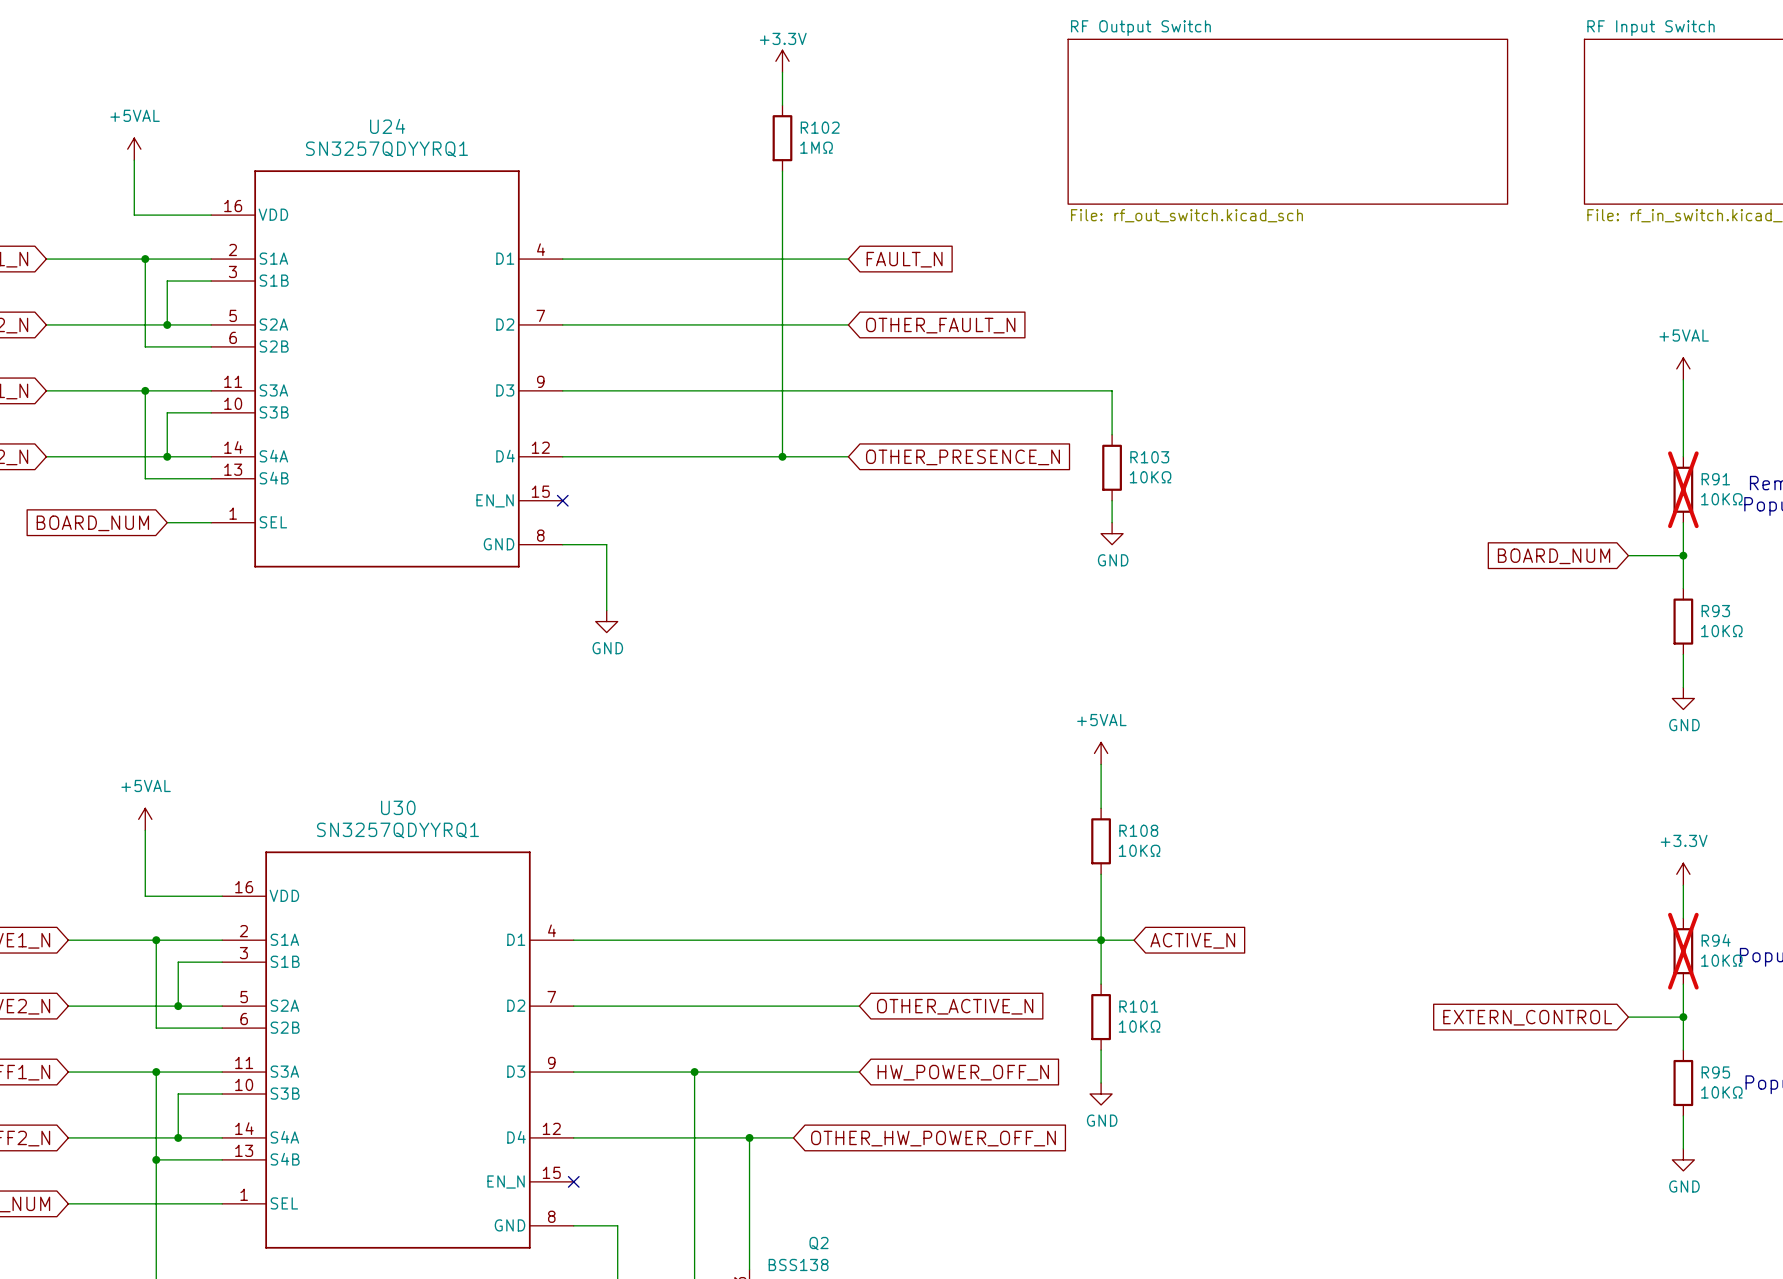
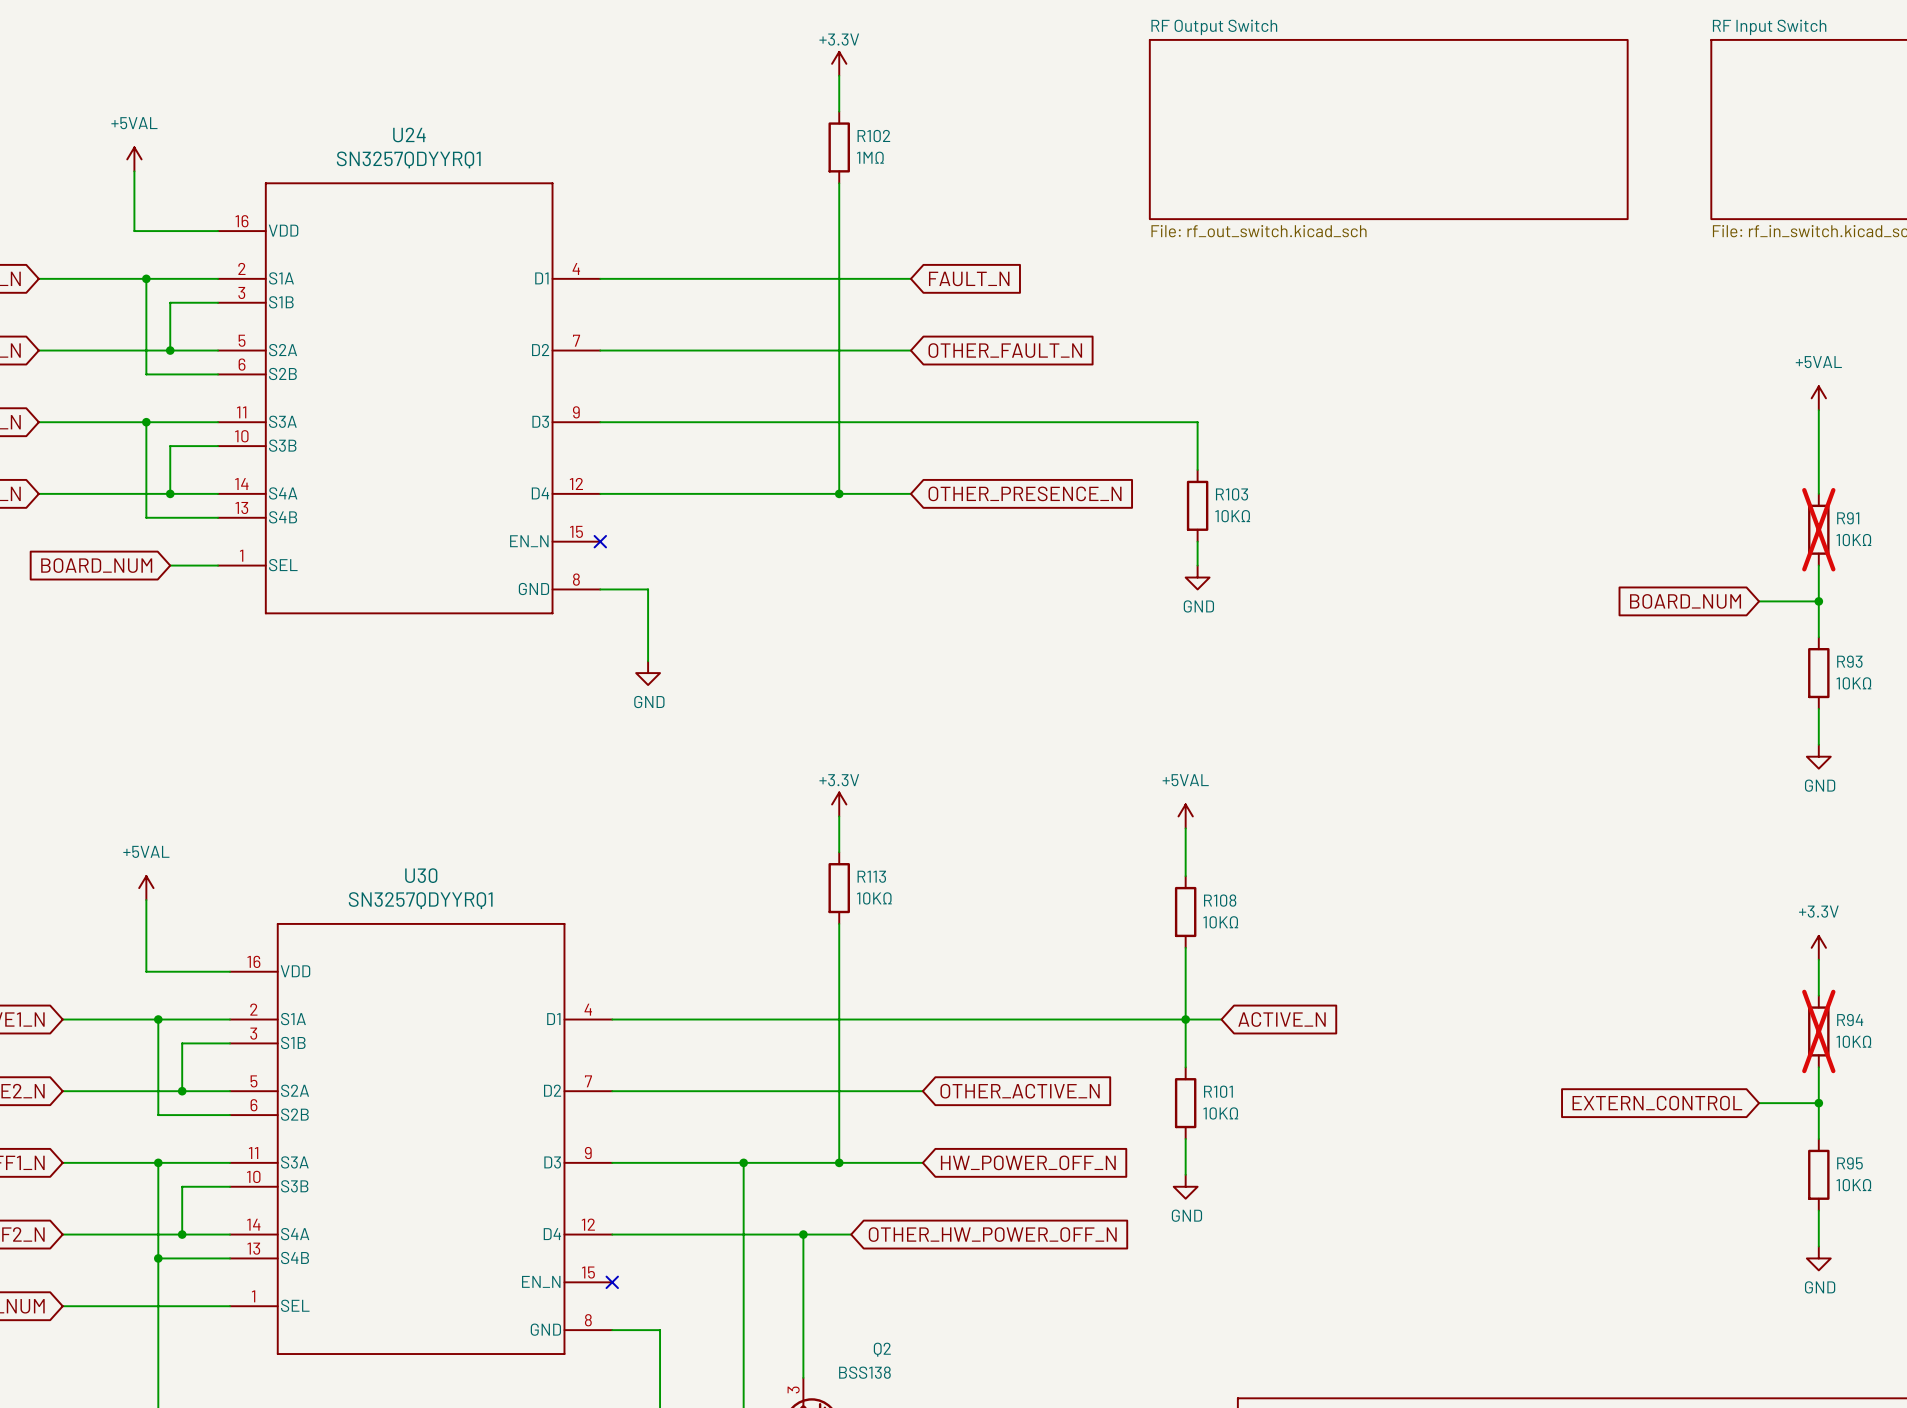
power symbol: none -> +3.3V (839, 804)
wire: none -> (839, 816) (839, 852)
R113: none -> 10KΩ (839, 888)
wire: none -> (839, 923) (839, 1162)
junction: none -> (839, 1162)

